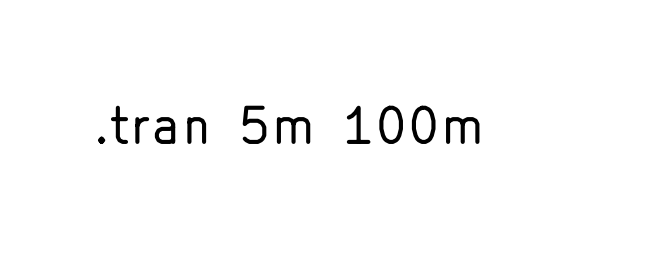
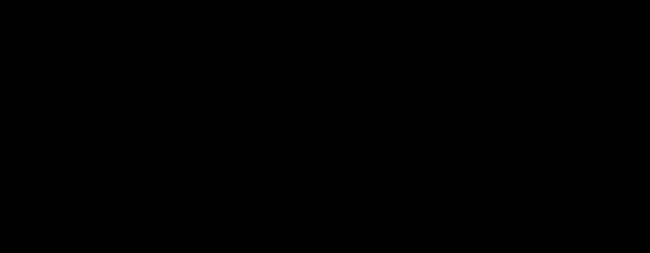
text: .tran 5m 100m (288, 124) -> none

